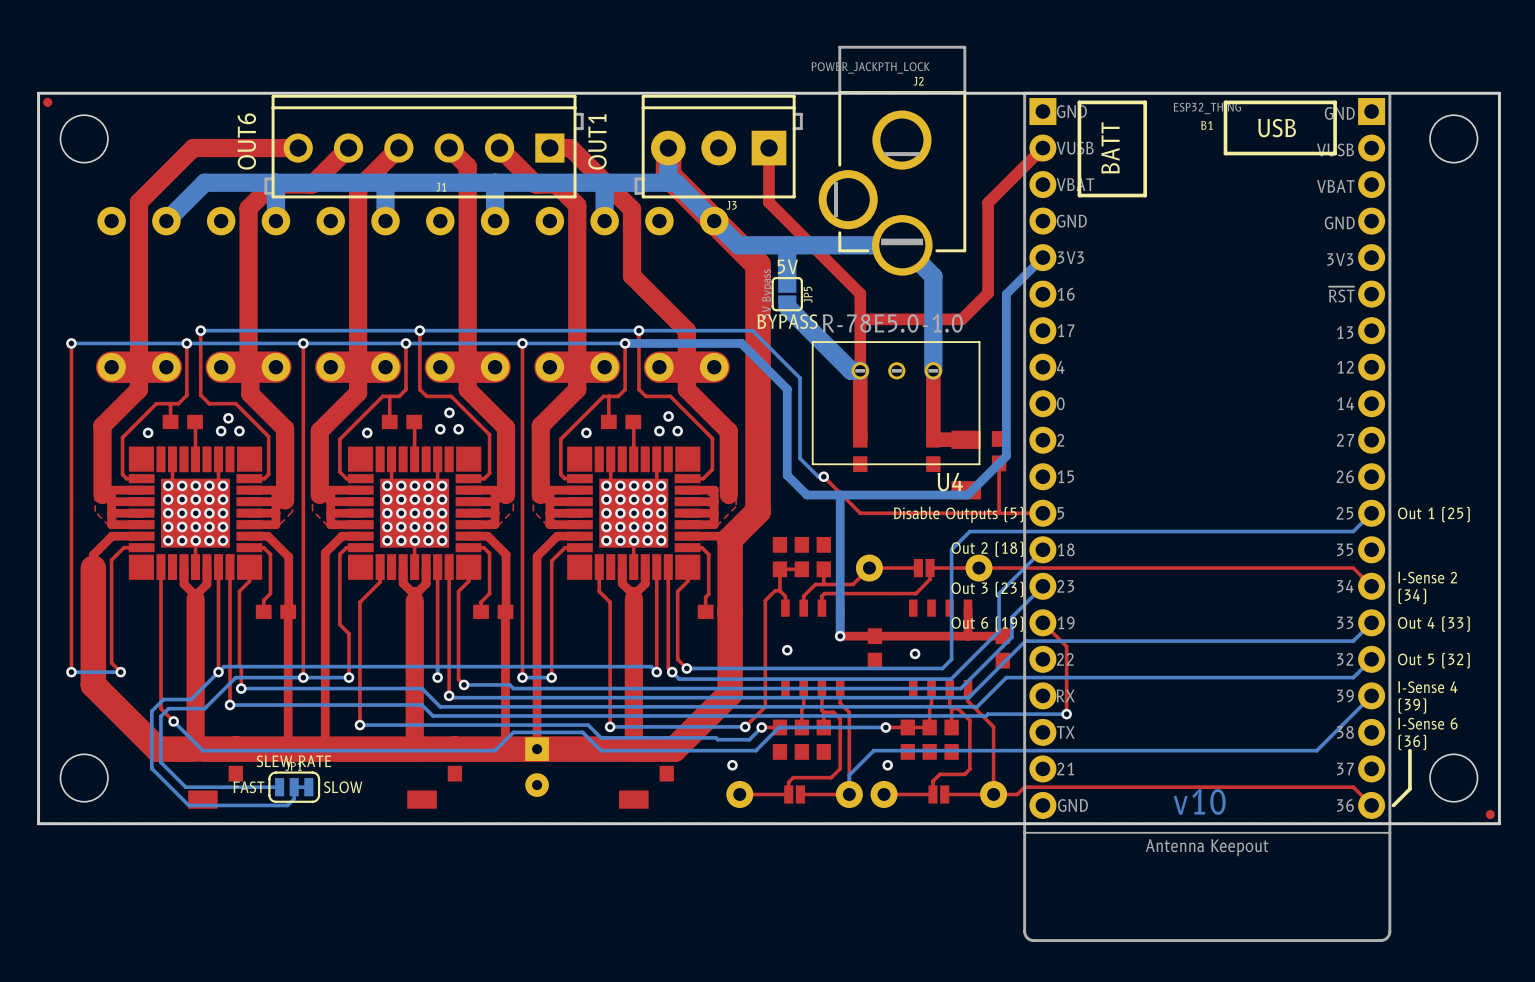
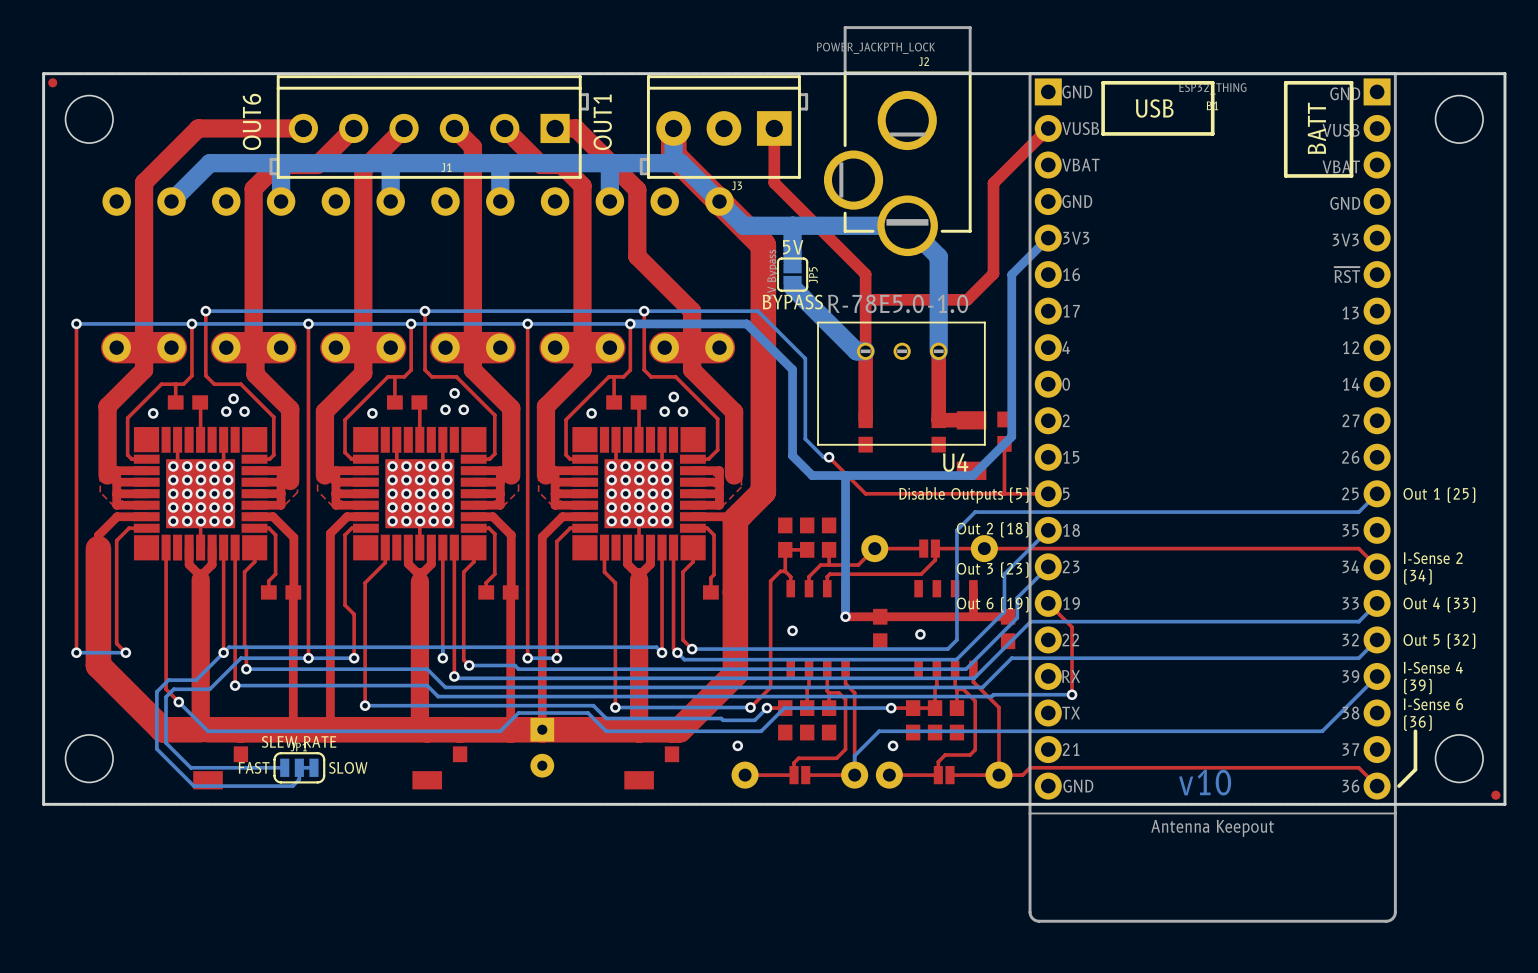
line: (1145, 102) (1145, 195) (1079, 195) (1079, 102) (1097, 102) -> (1150, 82) (1212, 82) (1212, 133) (1103, 133) (1103, 82)
line: (1335, 102) (1335, 153) (1225, 153) (1225, 102) (1280, 102) -> (1340, 82) (1351, 82) (1351, 175) (1285, 175) (1285, 82)
text position: USB (1277, 128) -> USB (1154, 108)
text position: BATT (1110, 148) -> BATT (1316, 128)

